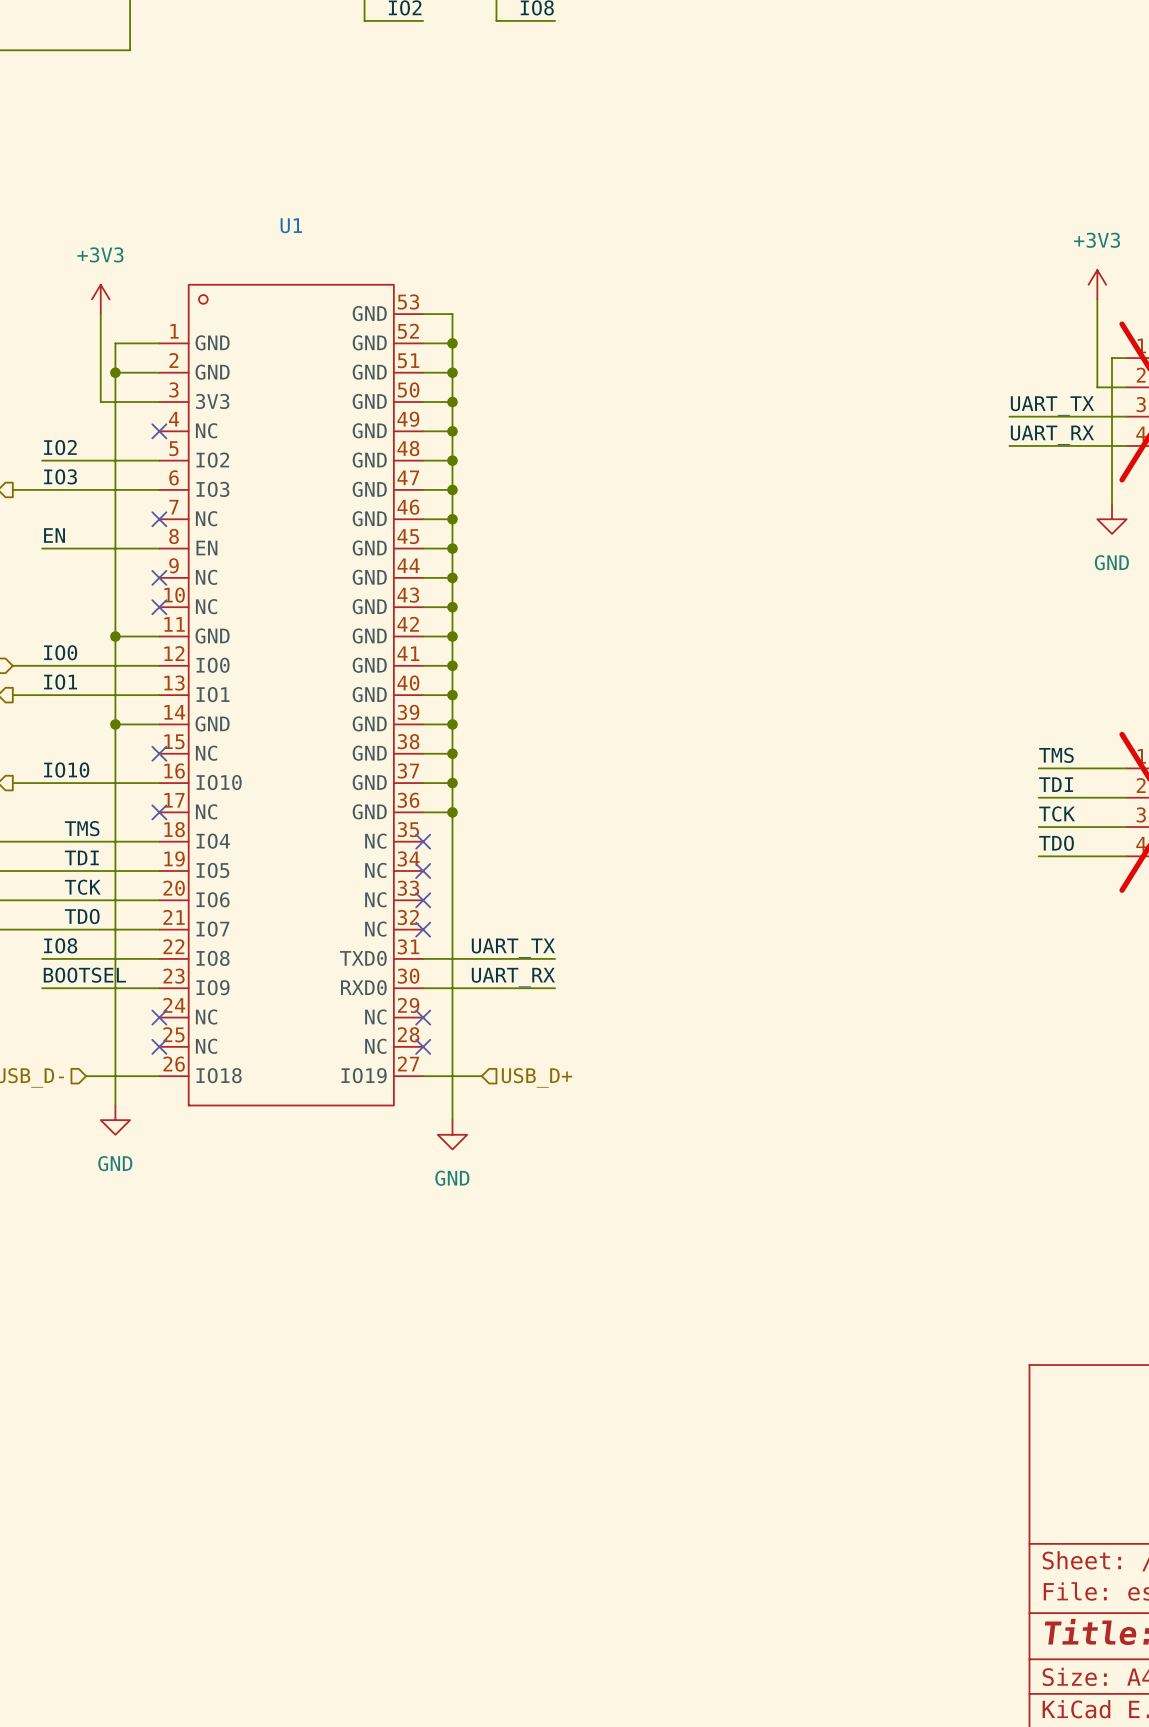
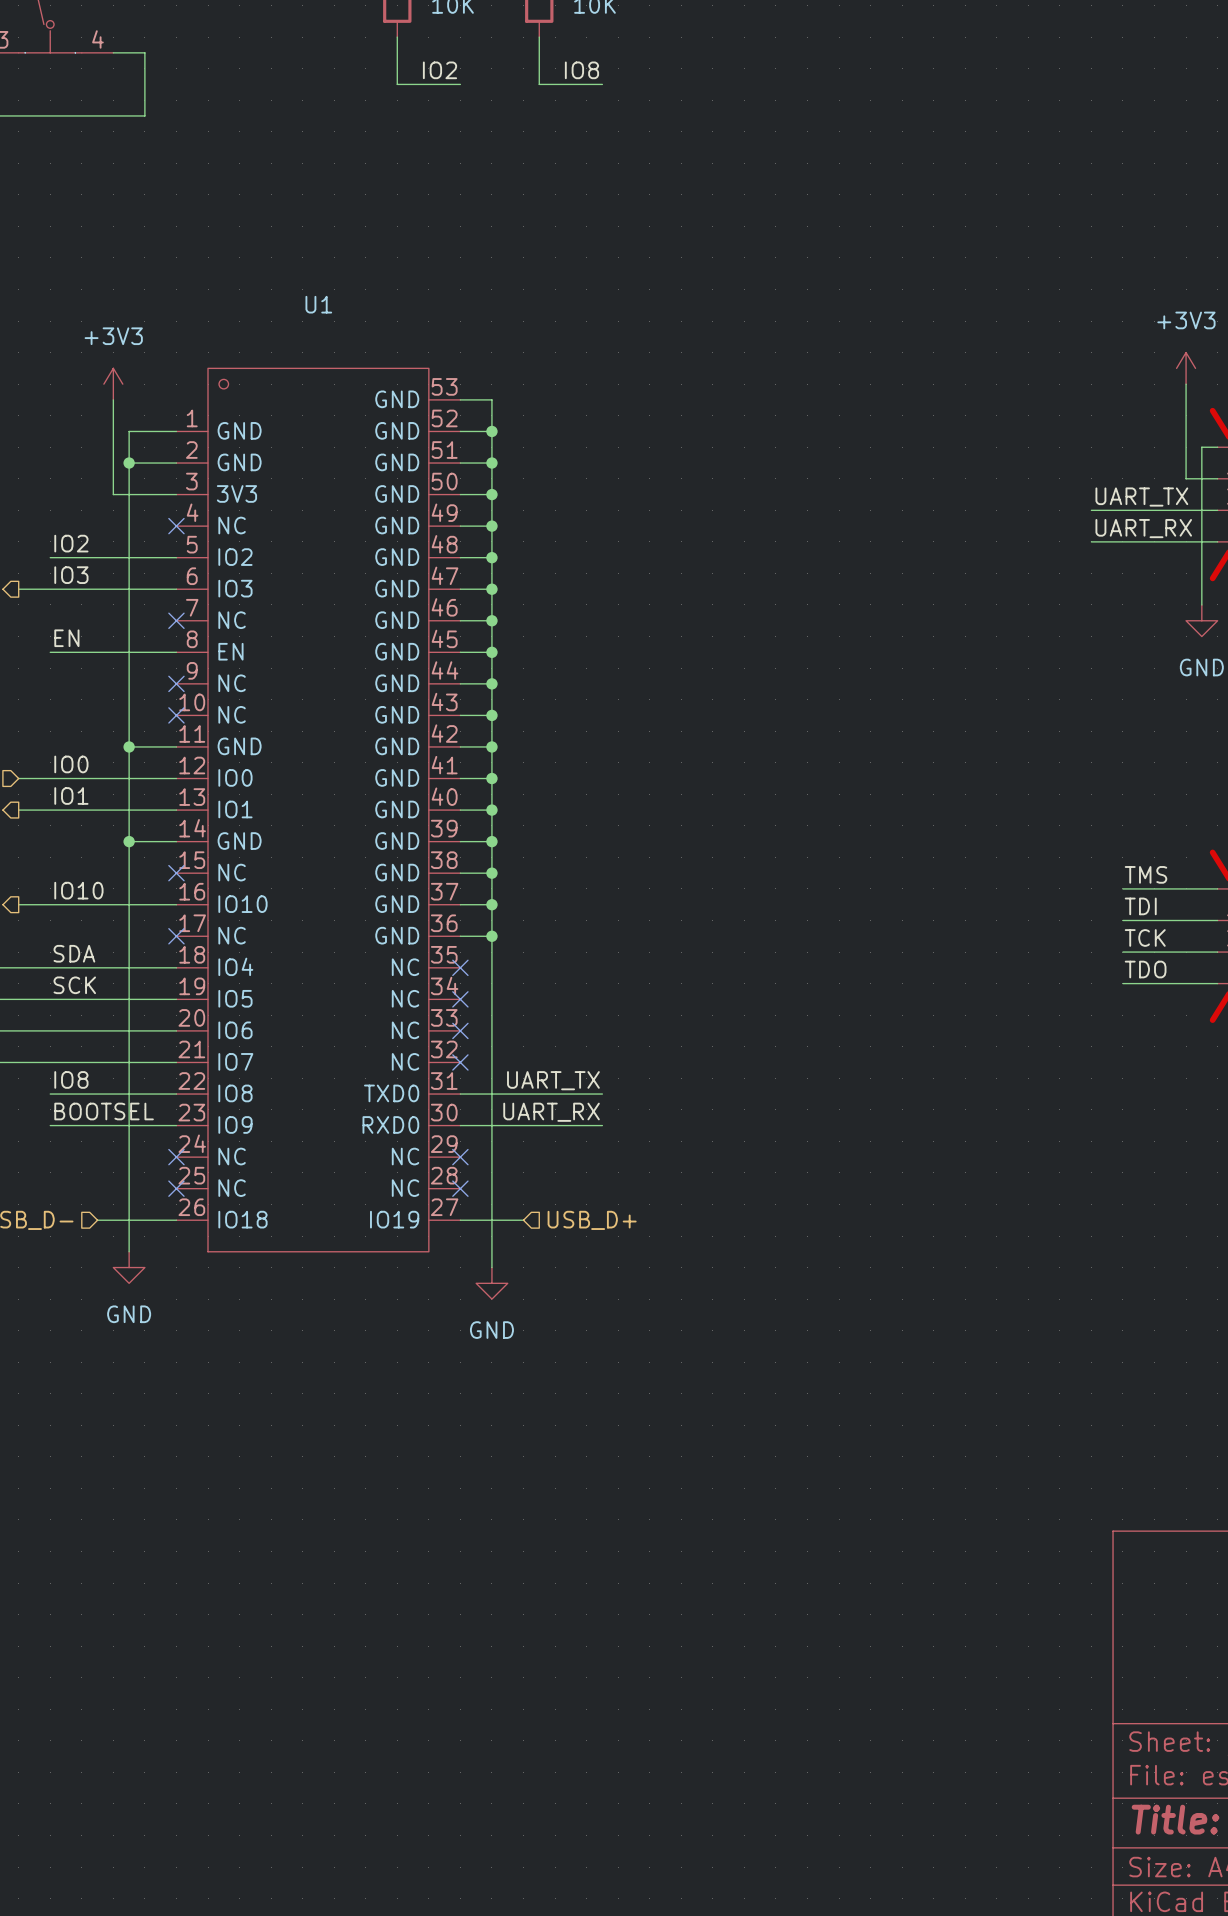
label: none -> SDA (74, 953)
label: TMS (82, 828) -> none
label: TDI (81, 857) -> none
label: TCK (82, 887) -> SCK (74, 985)
label: TDO (82, 916) -> none

